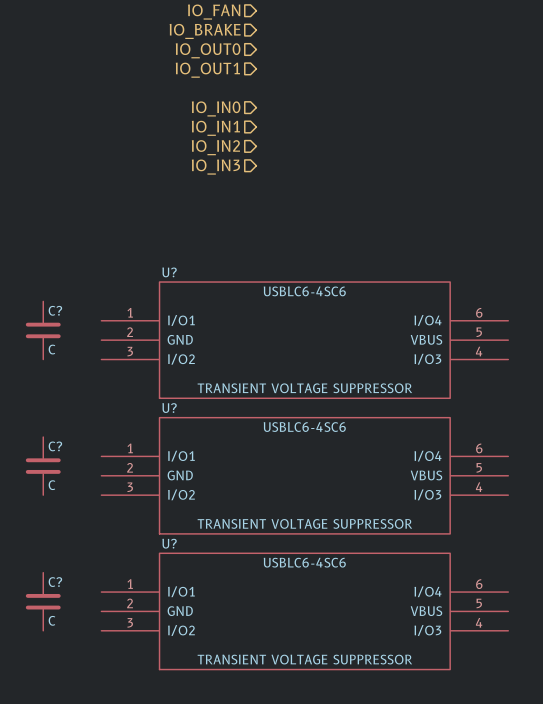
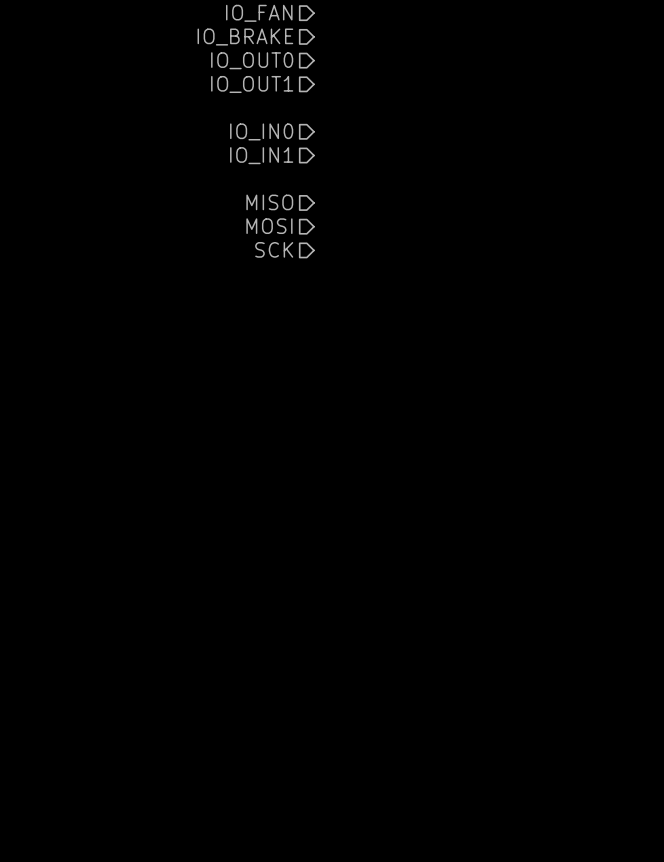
hierarchical label: IO_IN2 (215, 147) -> none
hierarchical label: IO_IN3 (215, 167) -> MISO (269, 202)
hierarchical label: none -> MOSI (269, 226)
hierarchical label: none -> SCK (274, 249)
C?: C (43, 330) -> none
U?: USBLC6-4SC6 (304, 340) -> none
C?: C (43, 466) -> none
U?: USBLC6-4SC6 (304, 475) -> none
C?: C (43, 601) -> none
U?: USBLC6-4SC6 (304, 611) -> none

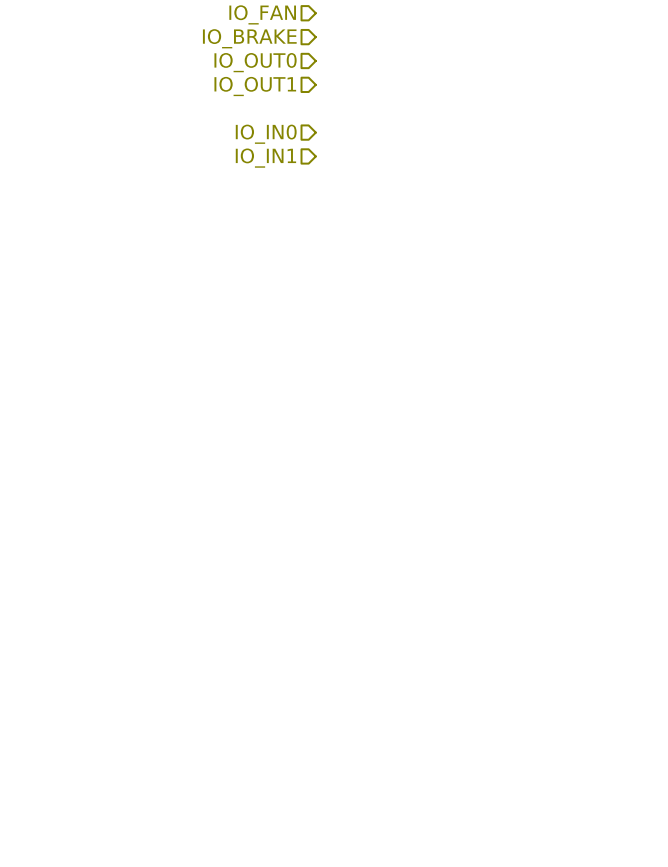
hierarchical label: MISO (269, 202) -> none
hierarchical label: MOSI (269, 226) -> none
hierarchical label: SCK (274, 249) -> none

